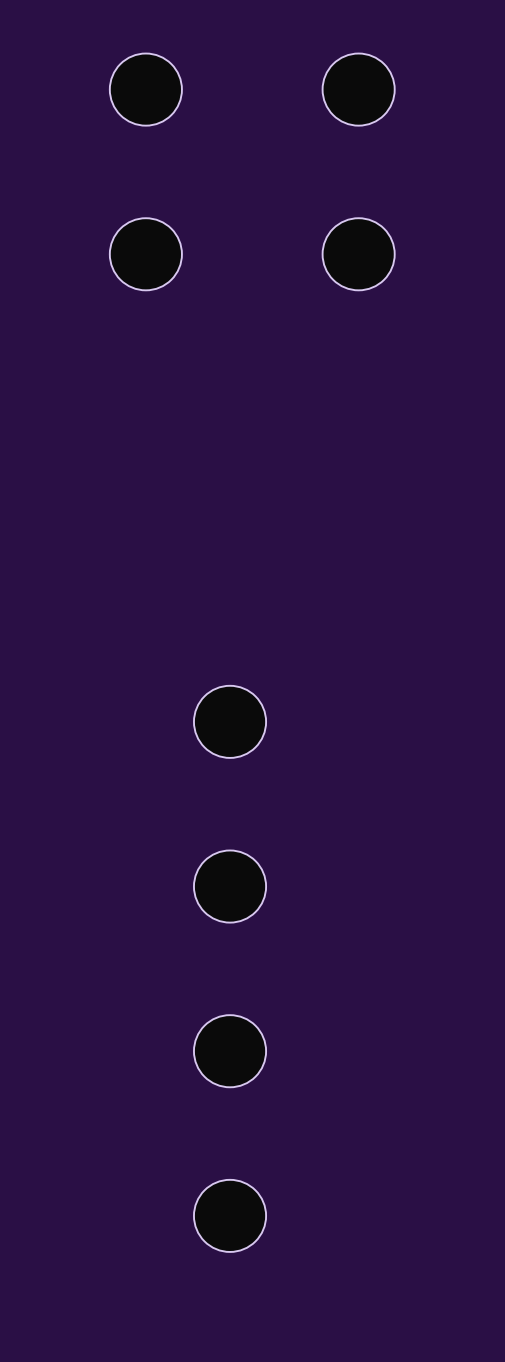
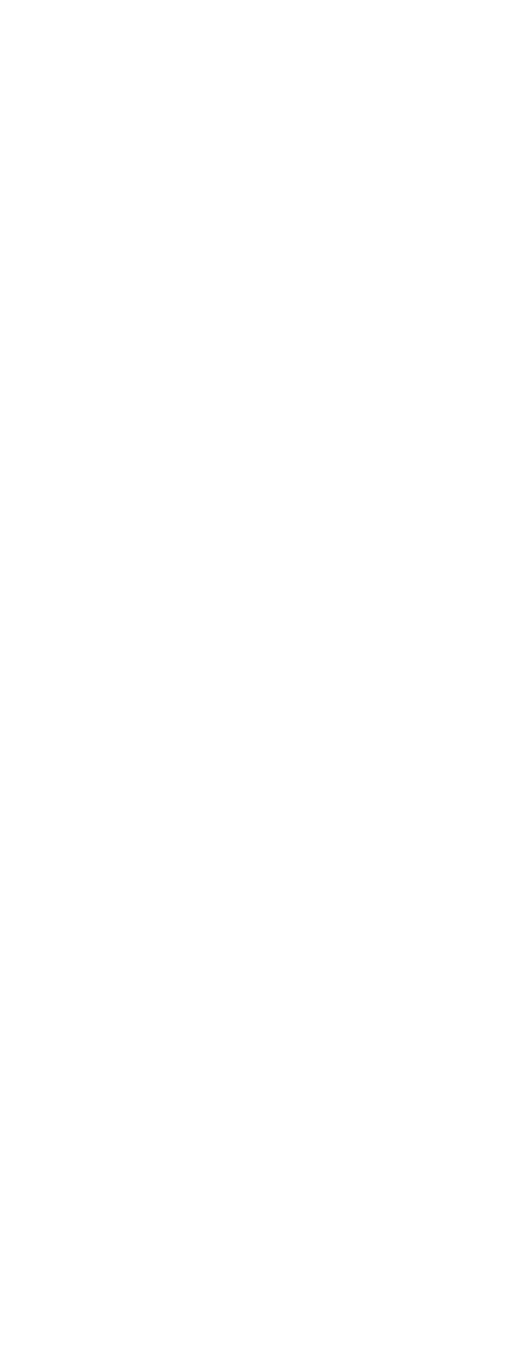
part: (145, 89) -> none
part: (358, 89) -> none
part: (145, 254) -> none
part: (358, 254) -> none
part: (230, 721) -> none
part: (230, 886) -> none
part: (230, 1051) -> none
part: (230, 1215) -> none

